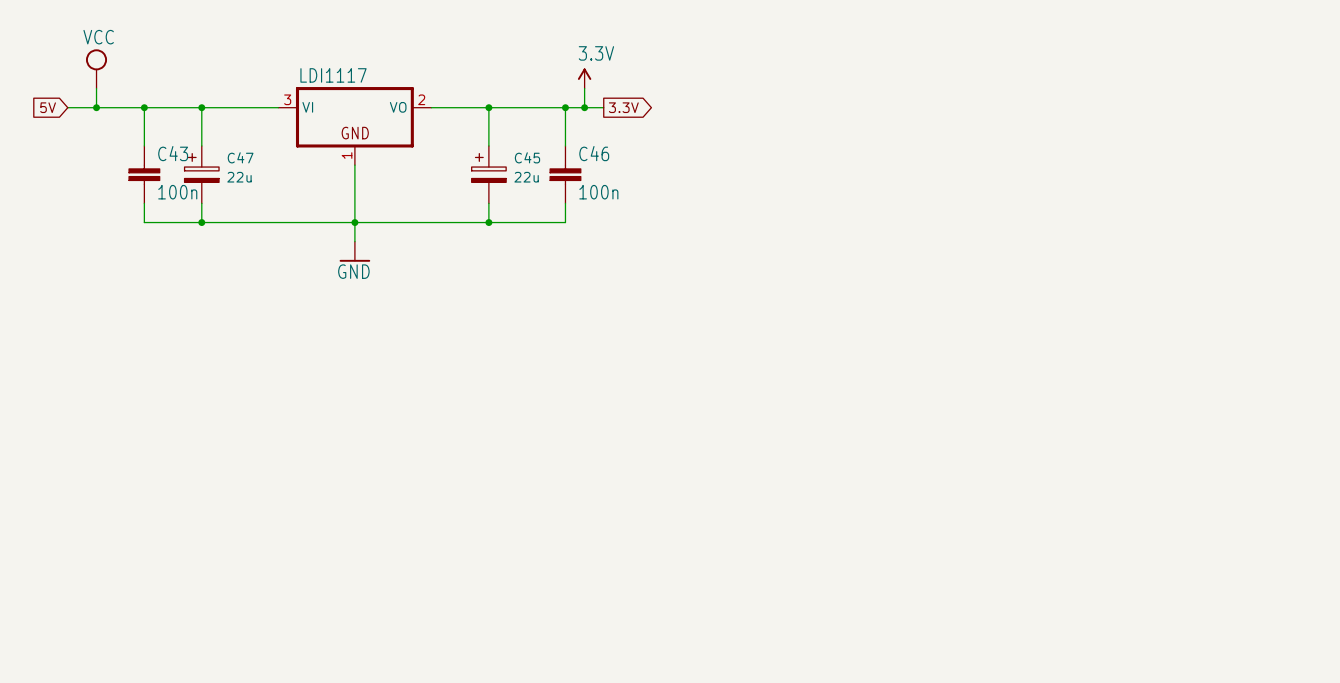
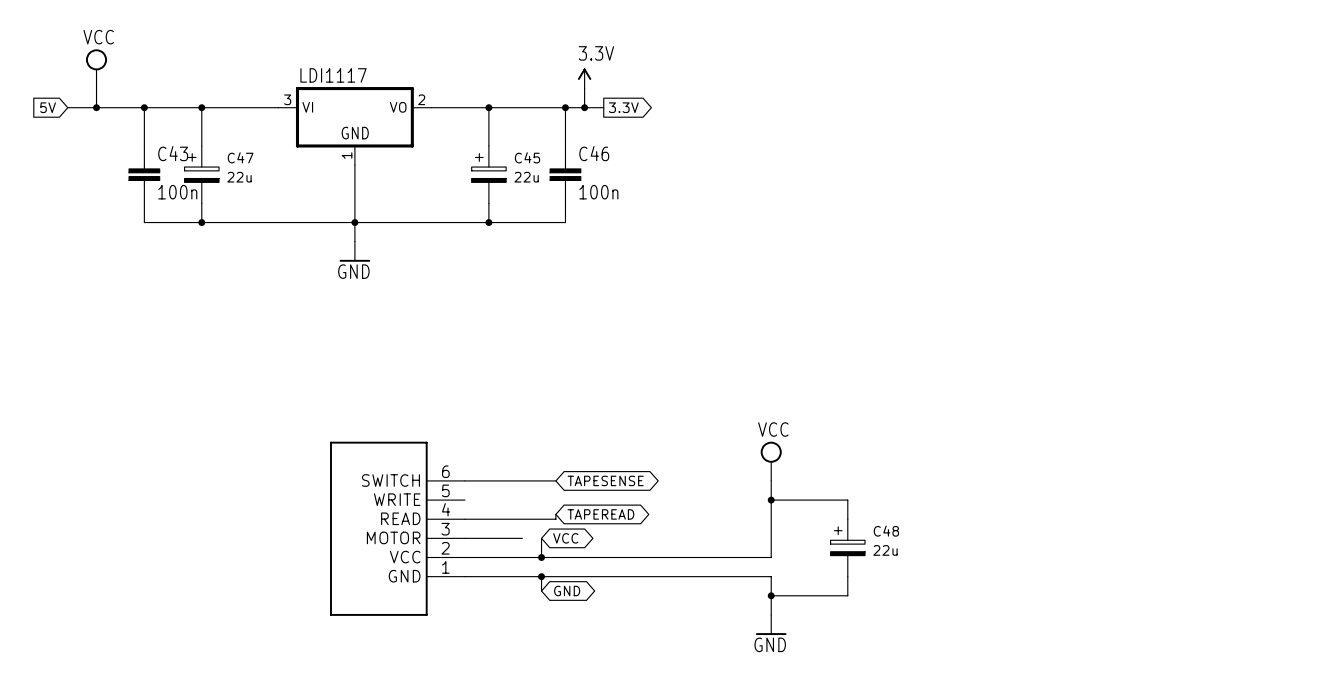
power symbol: none -> VCC (771, 461)
wire: none -> (464, 480) (555, 480)
global label: none -> TAPESENSE (605, 480)
wire: none -> (771, 480) (771, 557) (464, 557)
wire: none -> (771, 500) (847, 500) (847, 519)
junction: none -> (771, 500)
wire: none -> (555, 514) (555, 519) (464, 519)
global label: none -> TAPEREAD (600, 514)
part: none -> (397, 528)
wire: none -> (464, 538) (522, 538)
wire: none -> (541, 538) (541, 557)
global label: none -> VCC (565, 538)
C48: none -> 22u (847, 547)
junction: none -> (541, 557)
wire: none -> (464, 576) (771, 576) (771, 614)
wire: none -> (541, 576) (541, 591)
junction: none -> (541, 576)
wire: none -> (847, 576) (847, 595) (771, 595)
global label: none -> GND (567, 591)
junction: none -> (771, 595)
power symbol: none -> GND (771, 624)

